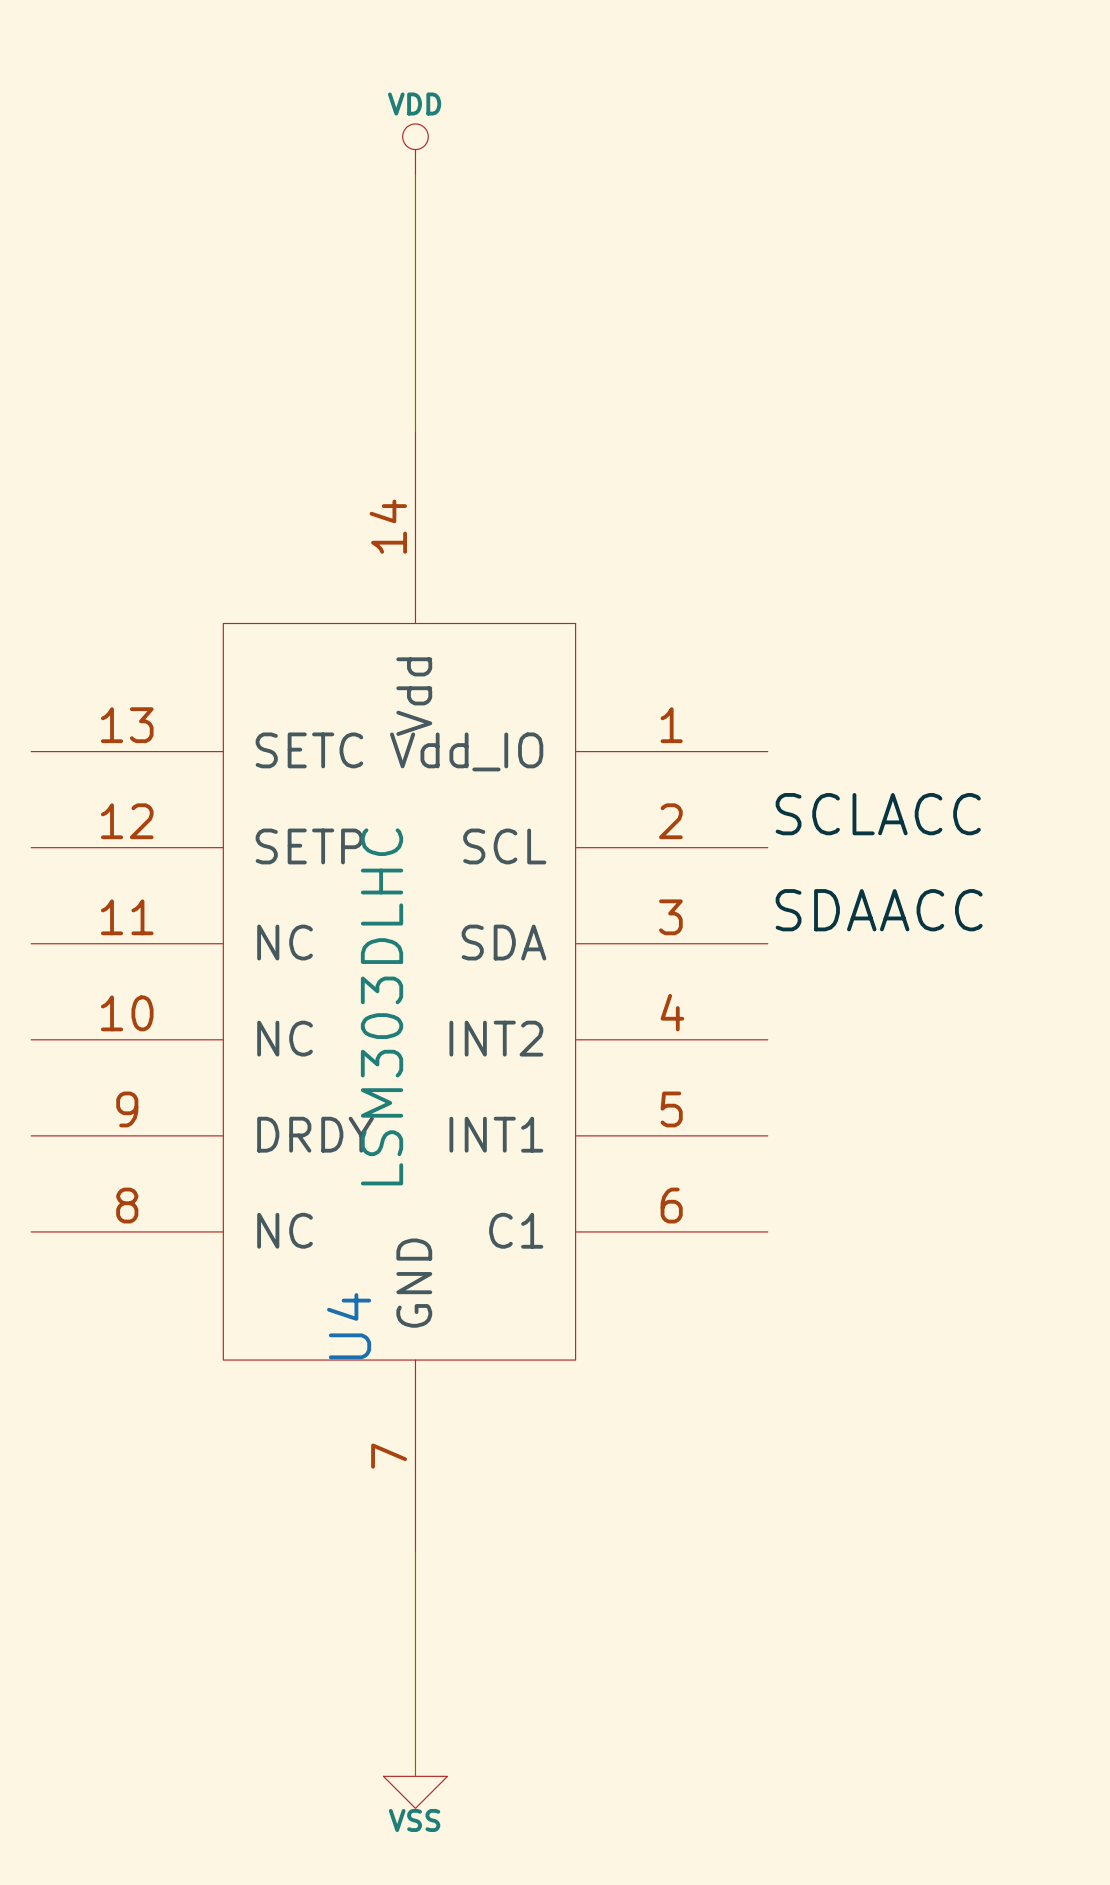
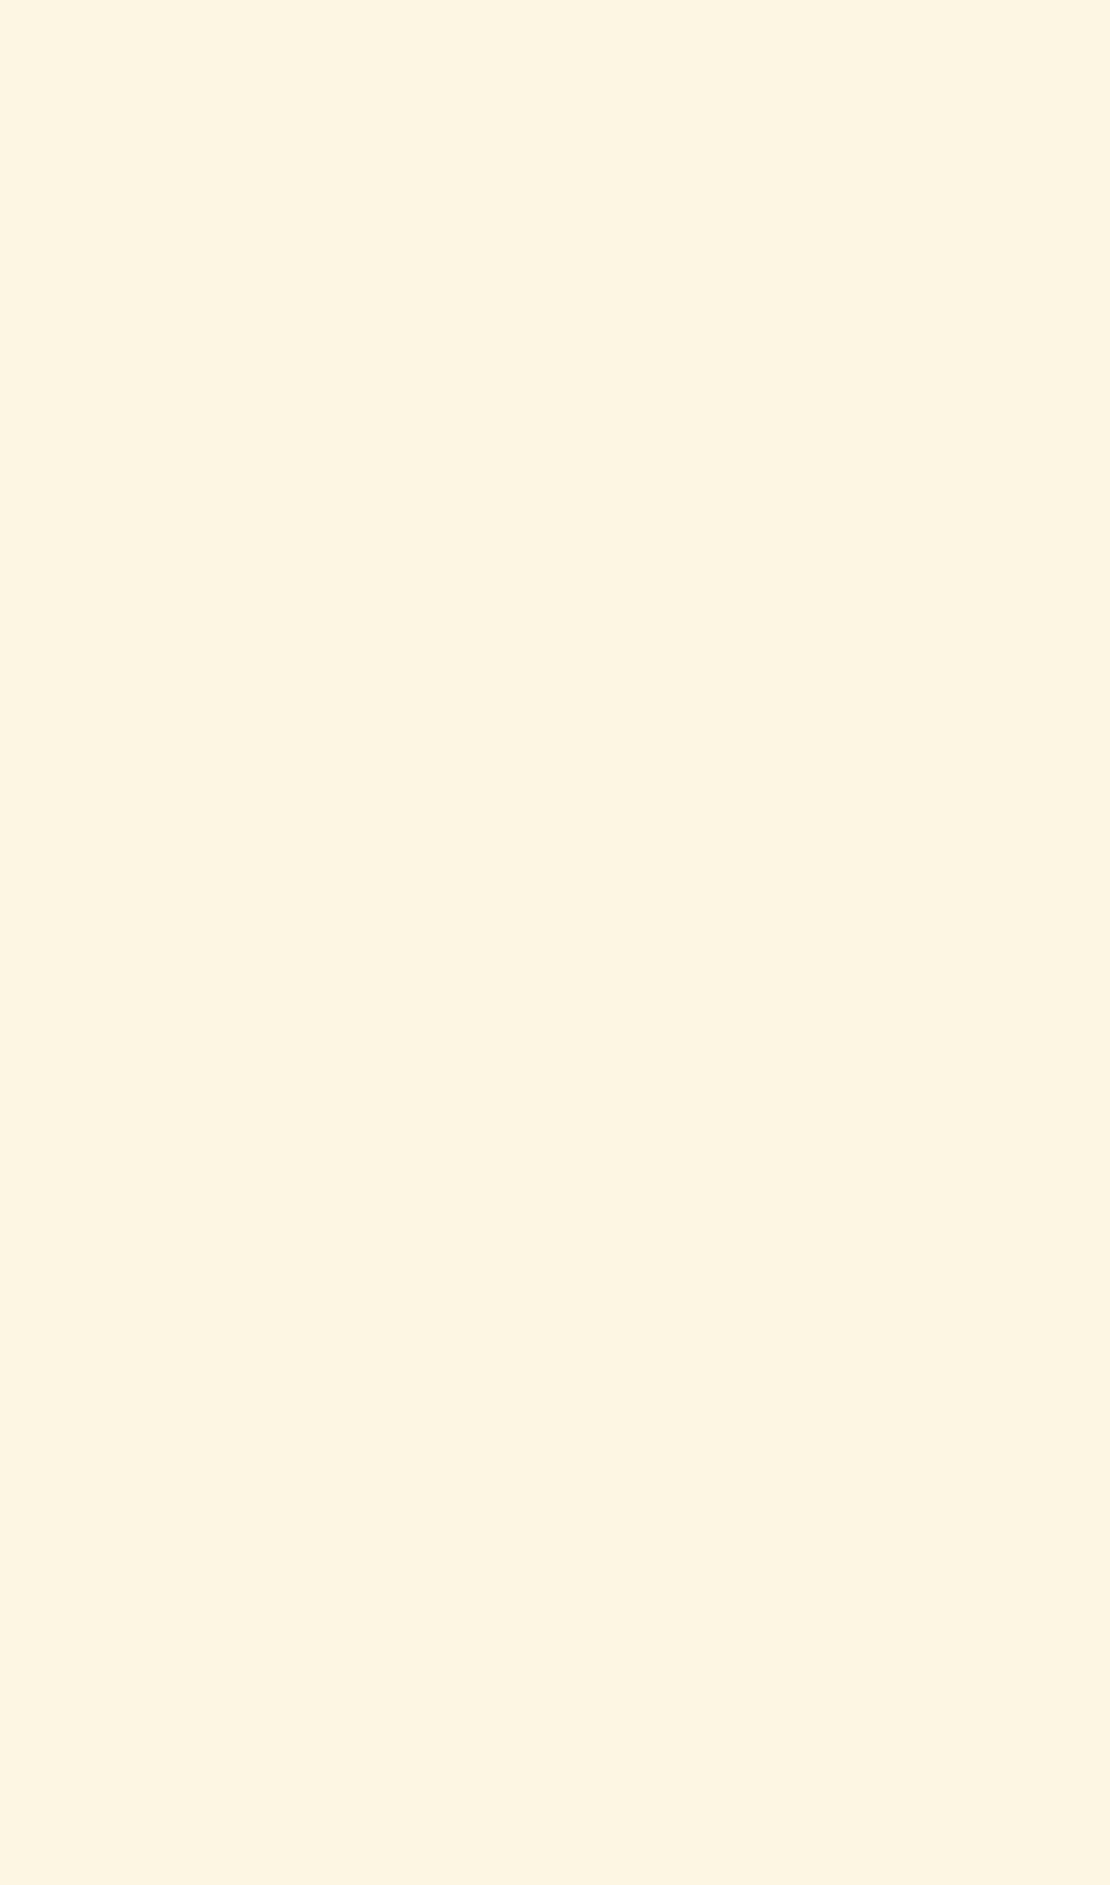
power symbol: VDD (415, 149) -> none
wire: (415, 175) (415, 431) -> none
label: SCLACC (878, 814) -> none
label: SDAACC (879, 910) -> none
U4: LSM303DLHC (399, 991) -> none
wire: (415, 1552) (415, 1776) -> none
power symbol: VSS (415, 1792) -> none

